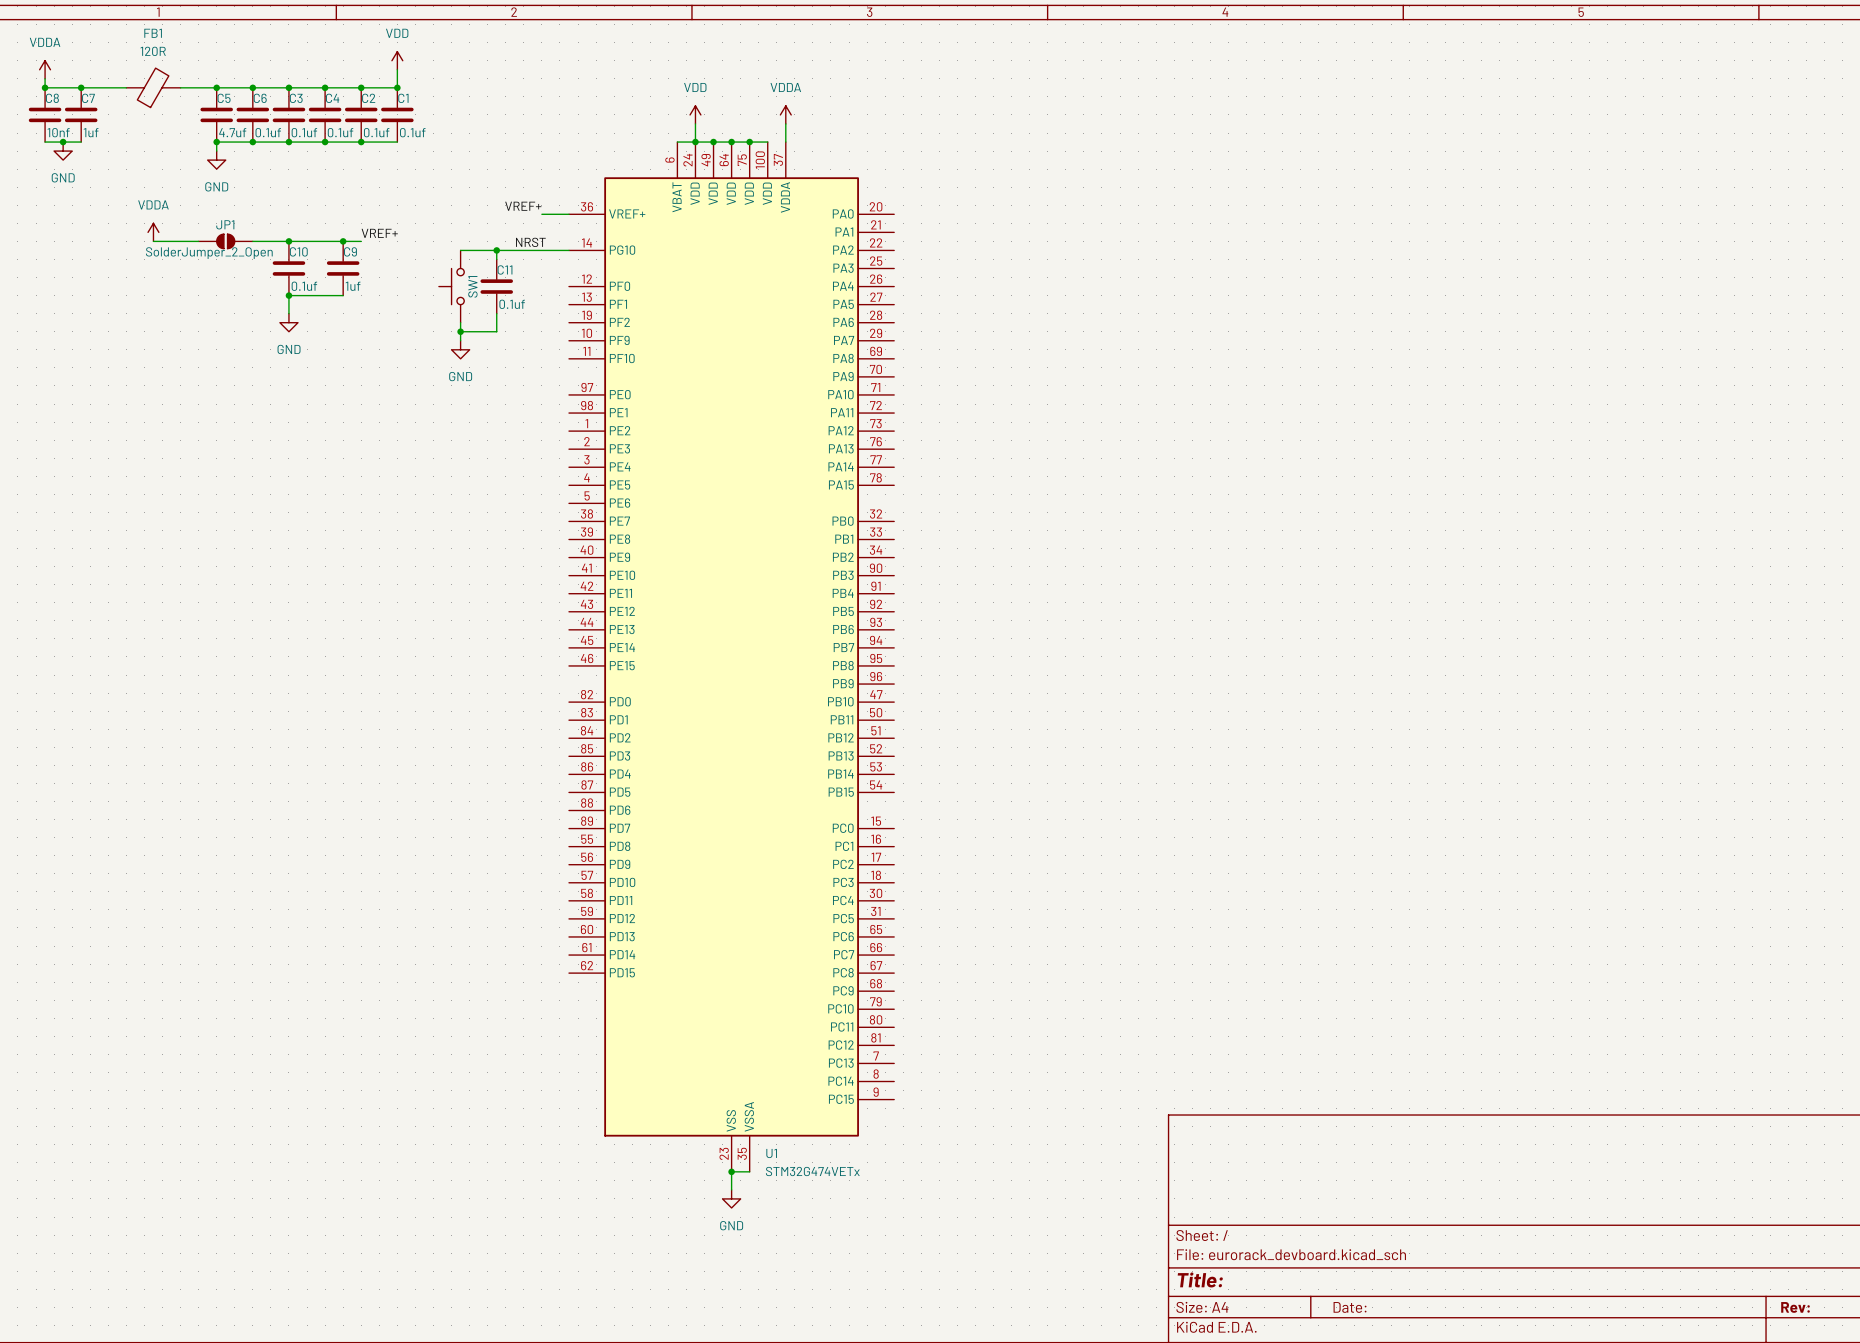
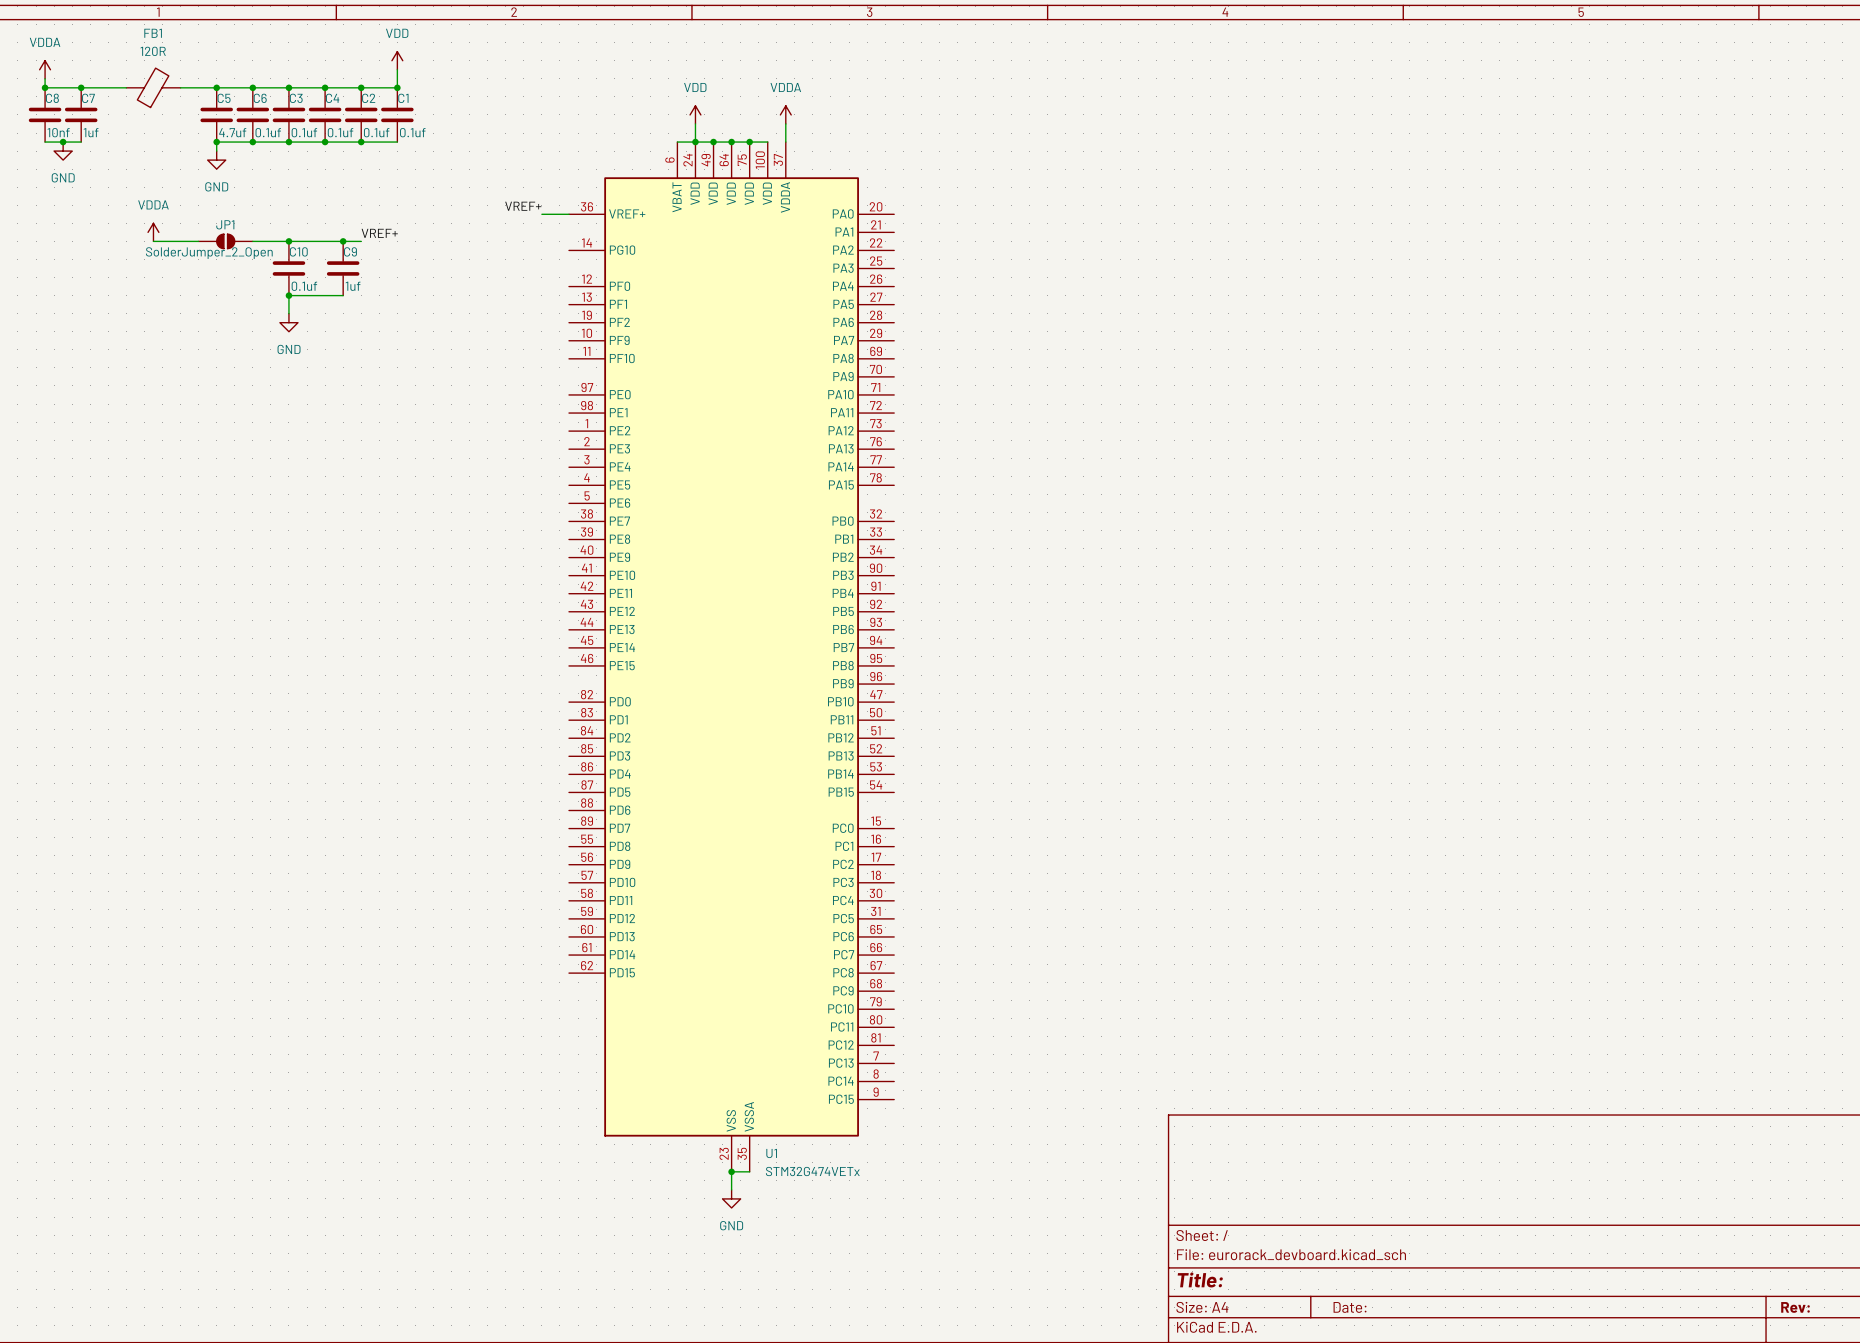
label: NRST (530, 242) -> none
wire: (460, 250) (568, 250) -> none
wire: (496, 250) (496, 259) -> none
junction: (496, 250) -> none
SW1: (451, 286) -> none
C11: 0.1uf (496, 286) -> none
wire: (496, 313) (496, 331) (460, 331) -> none
wire: (460, 322) (460, 340) -> none
junction: (460, 331) -> none
power symbol: GND (460, 349) -> none

